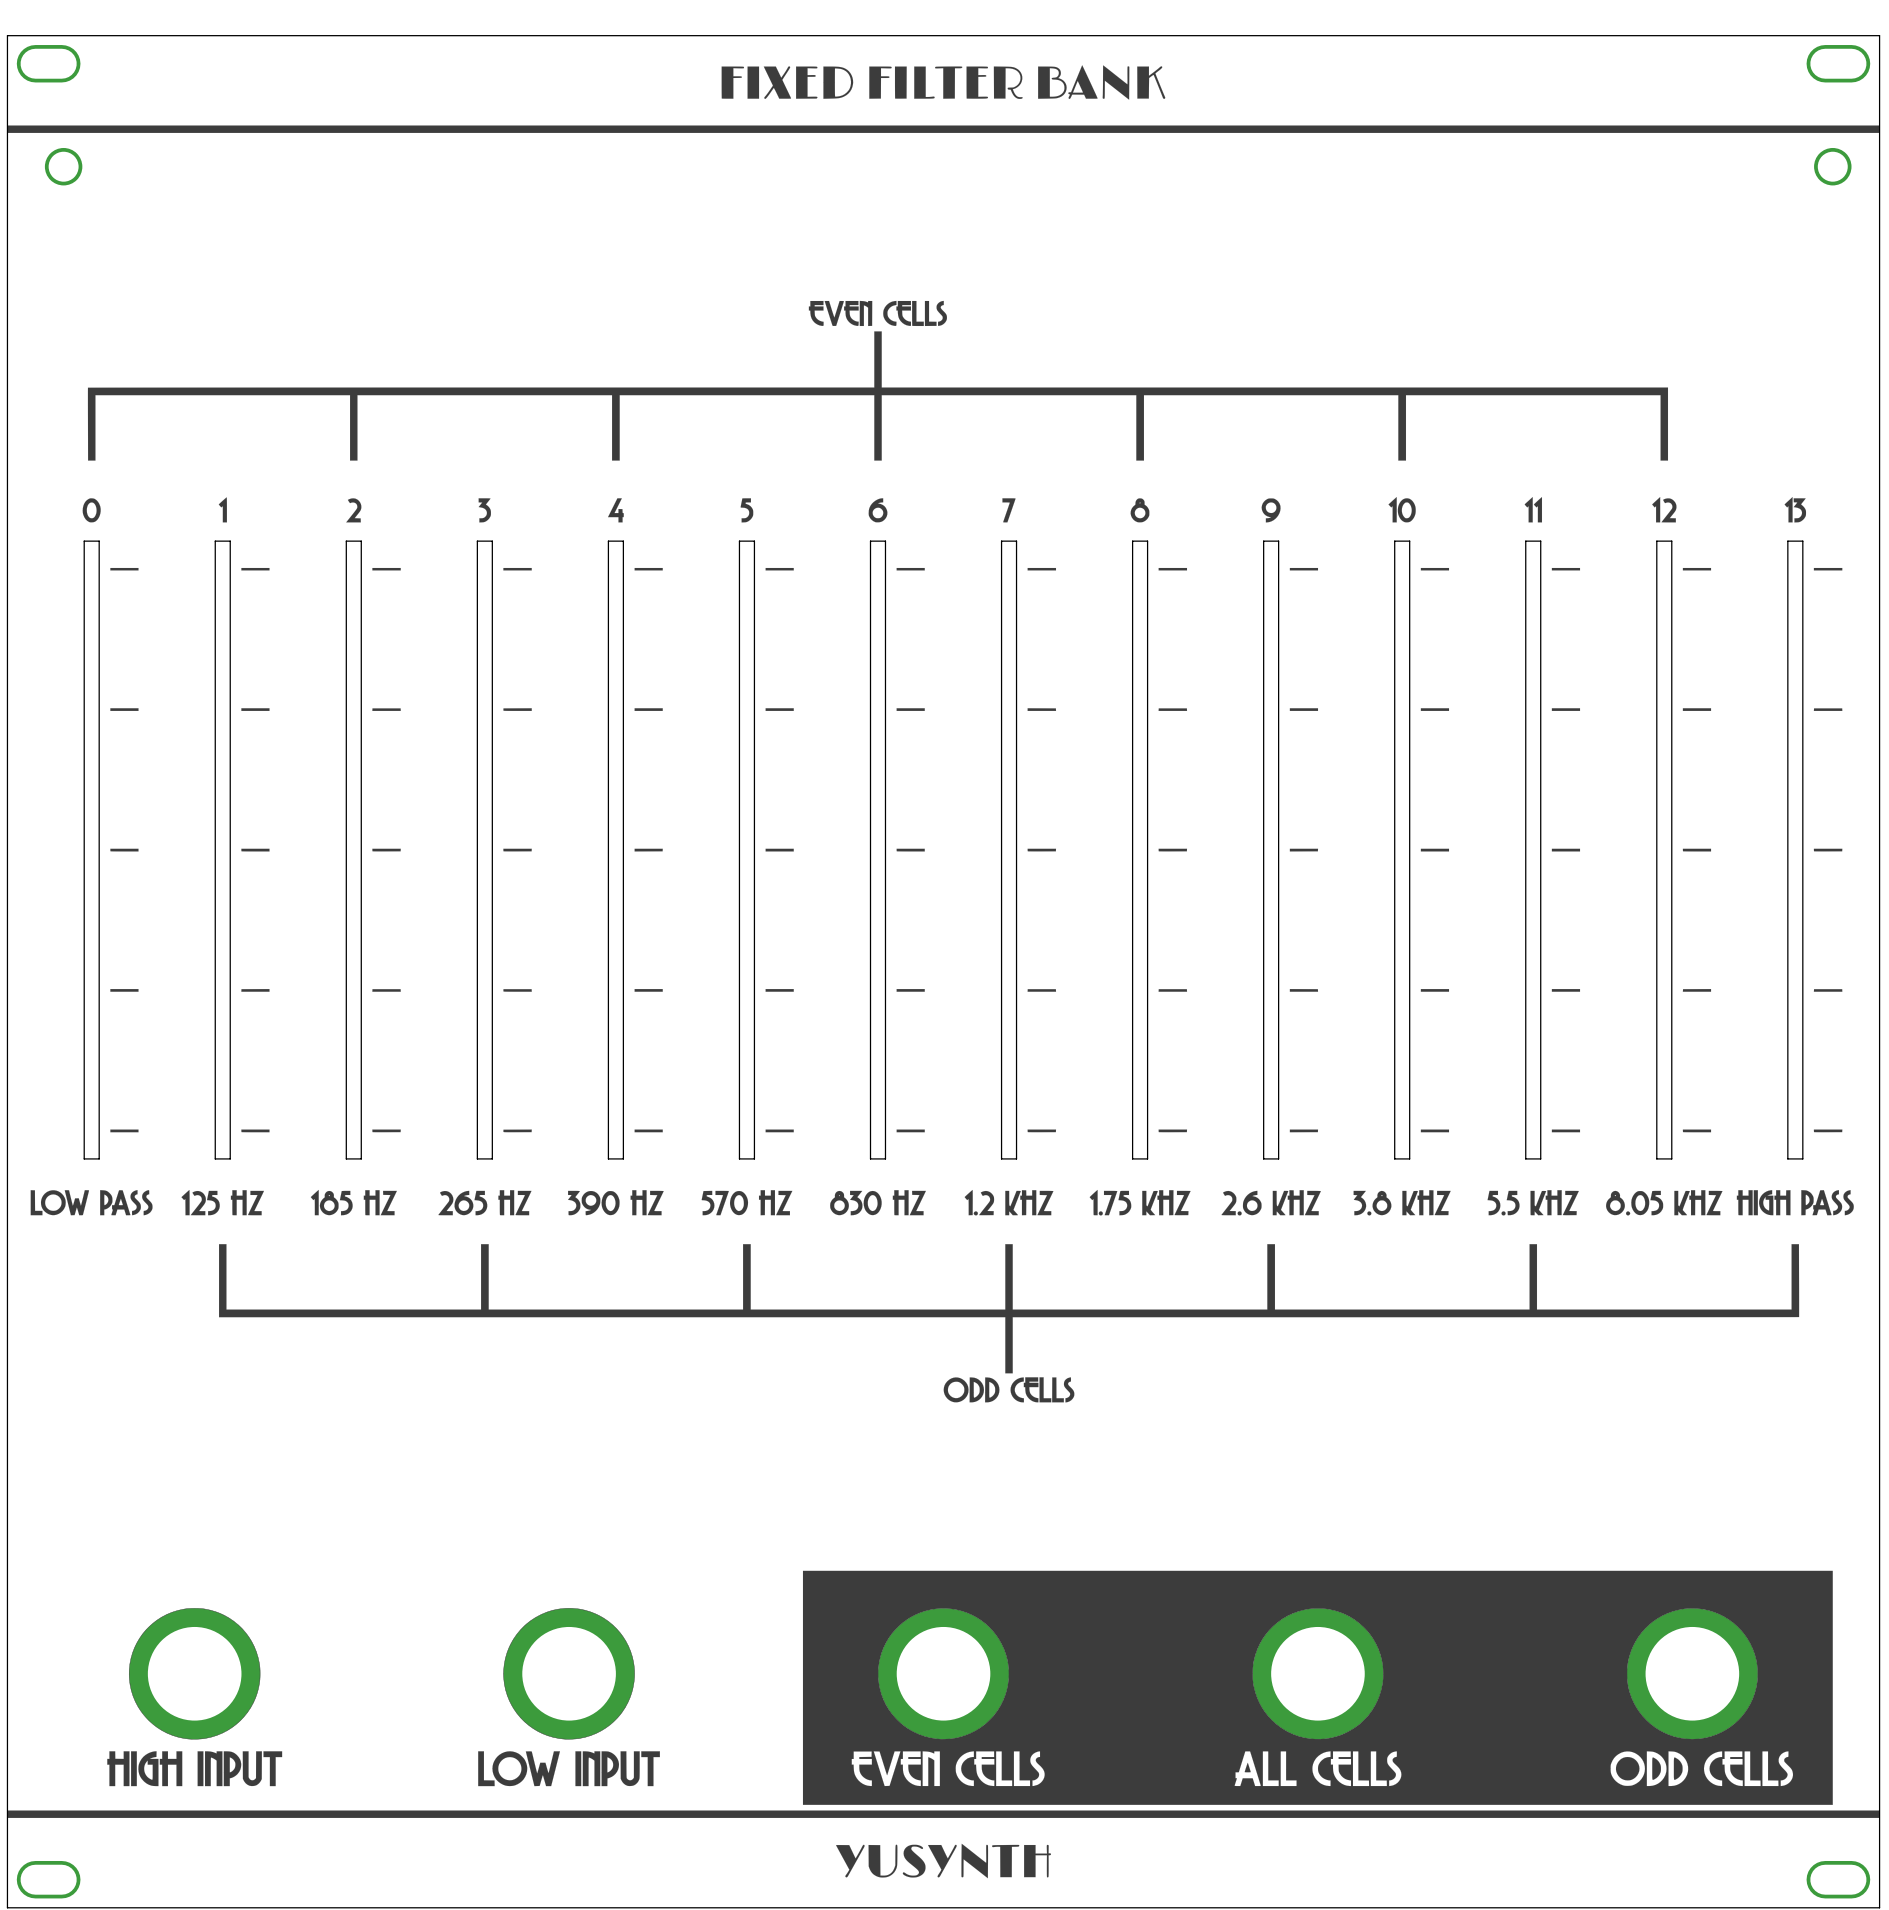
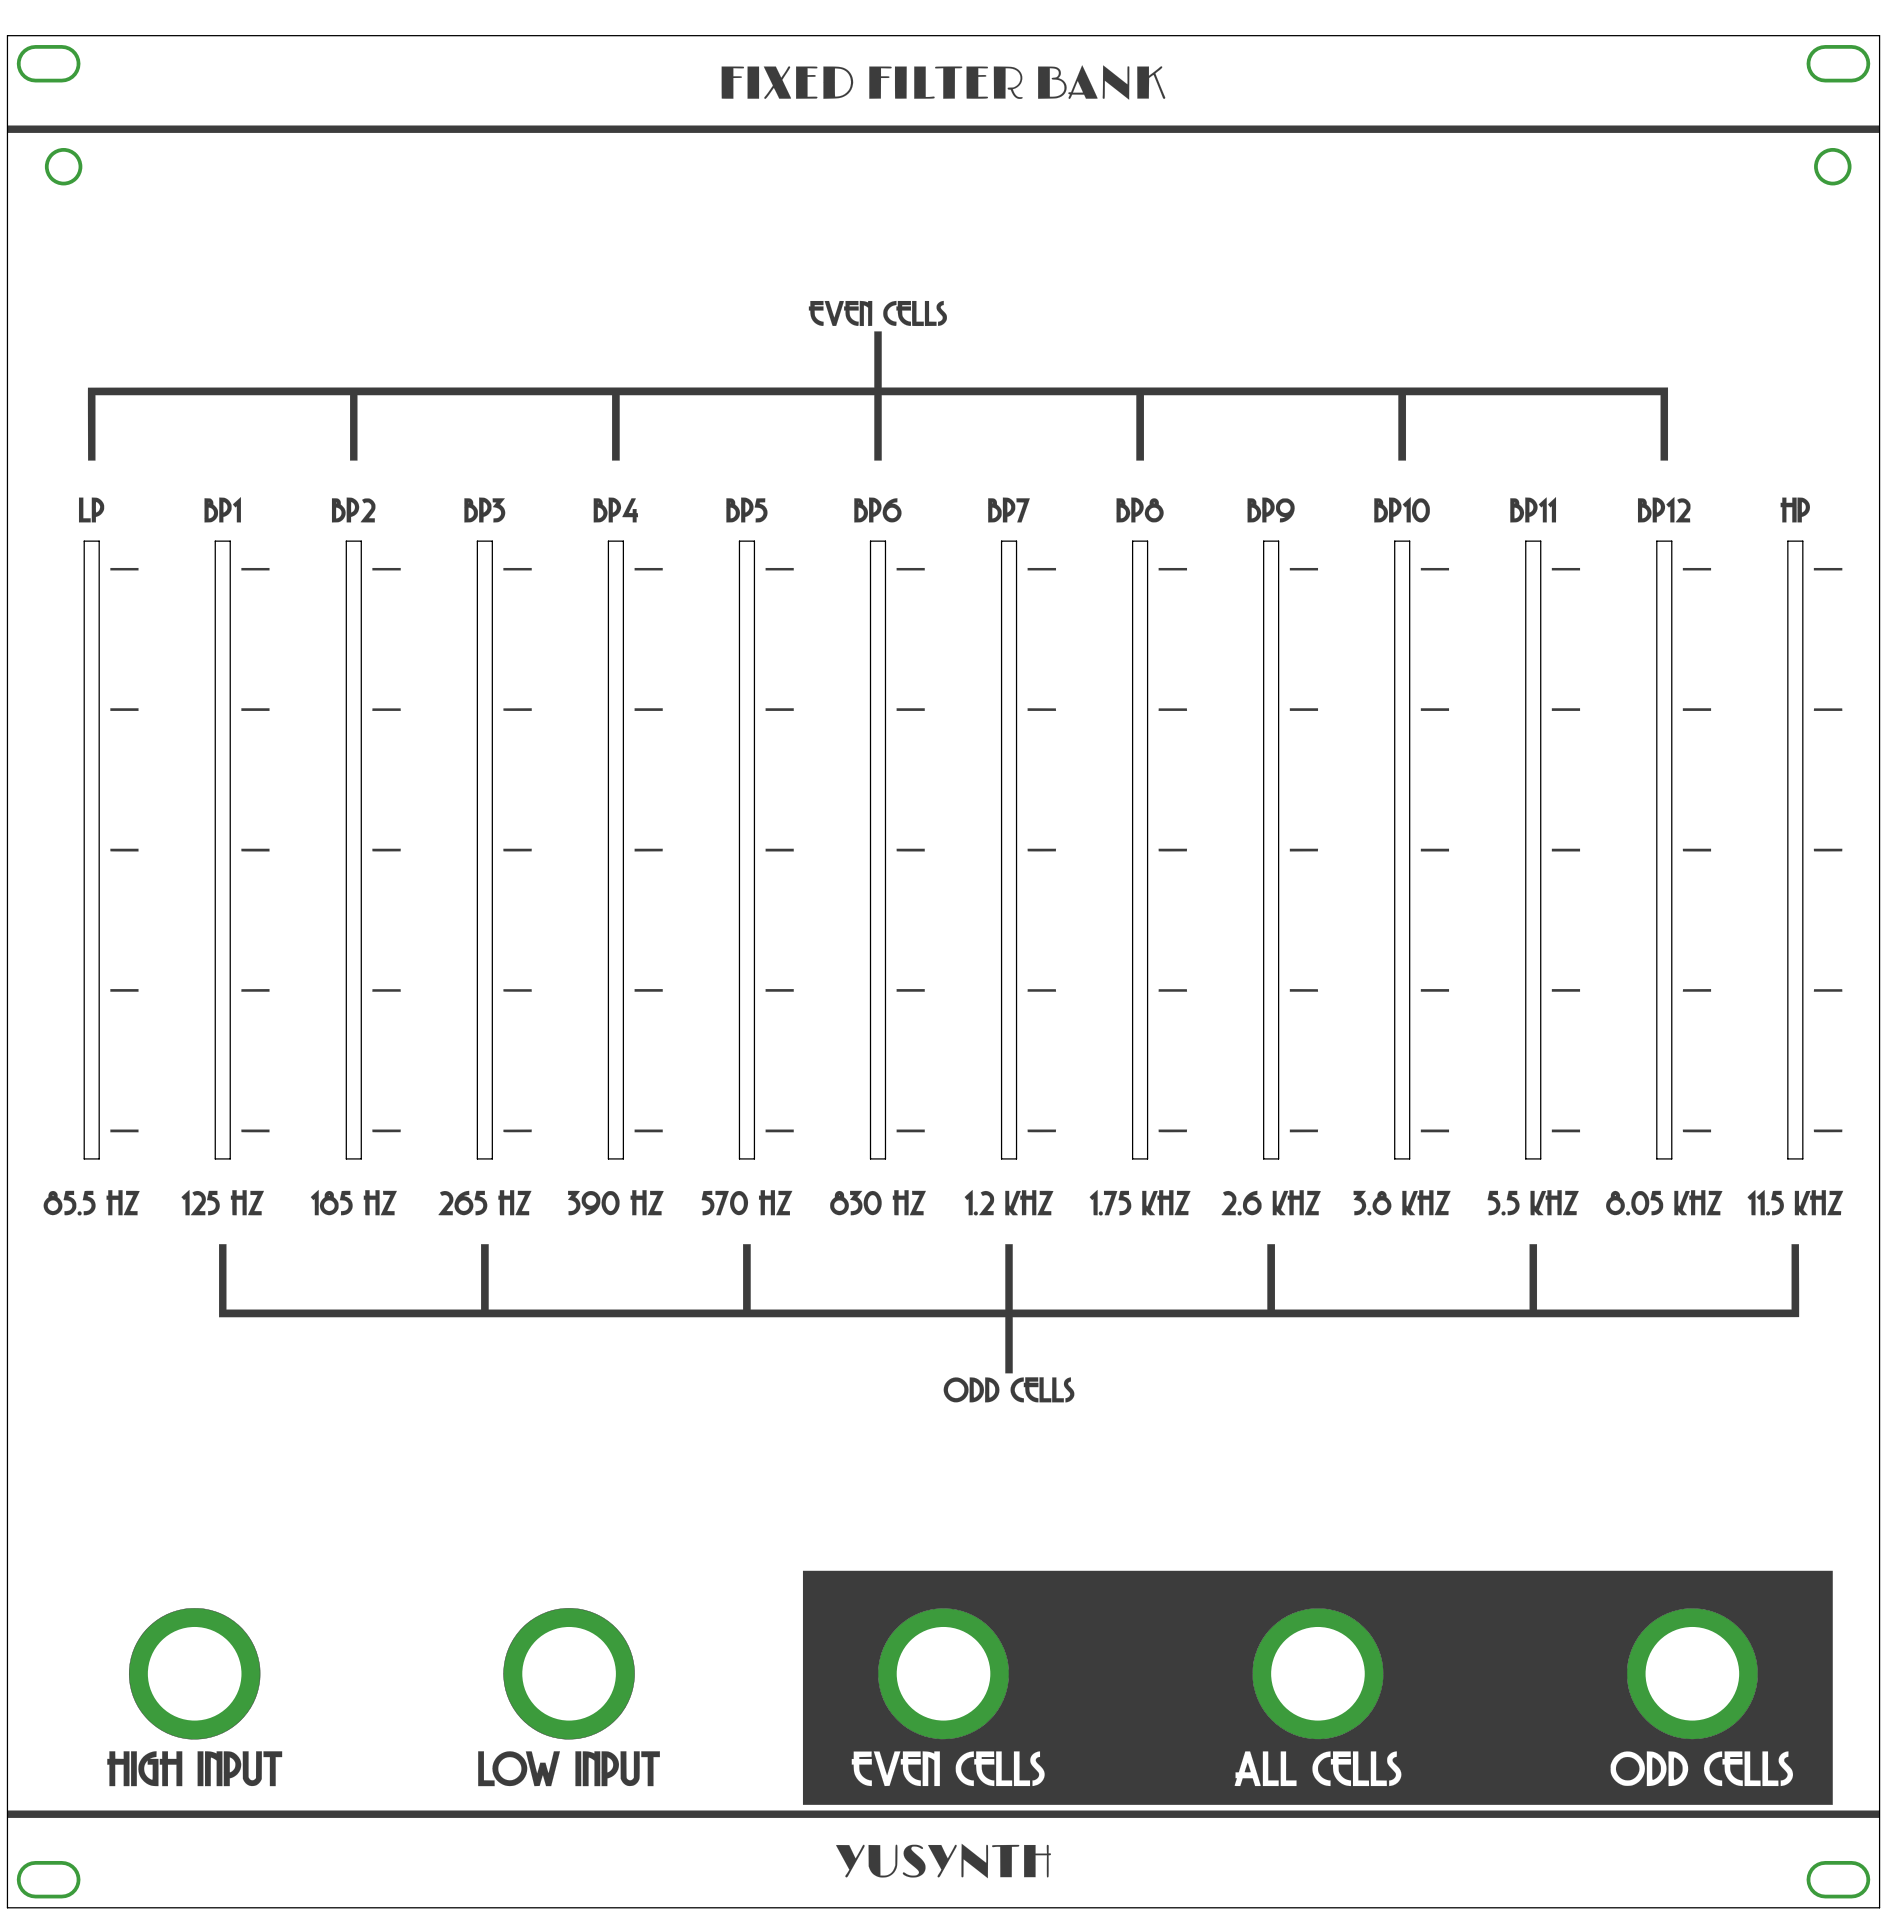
drawing shape: [7, 65, 1880, 1879] -> [7, 65, 1880, 1879]

